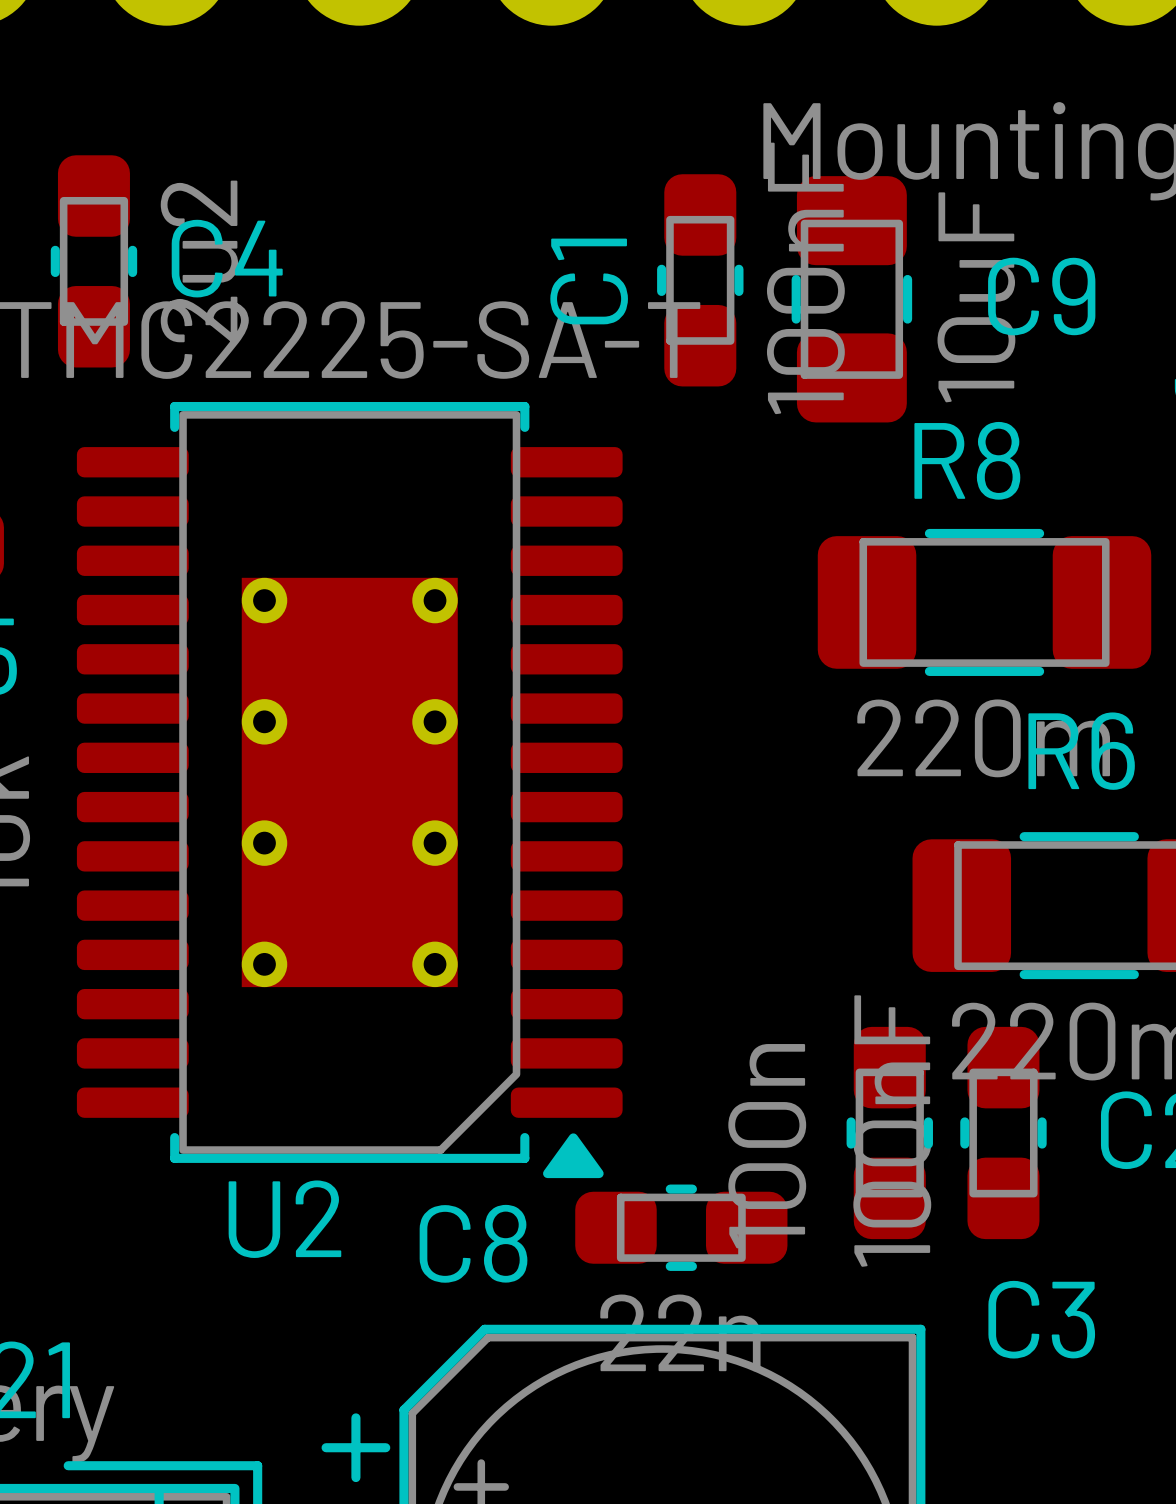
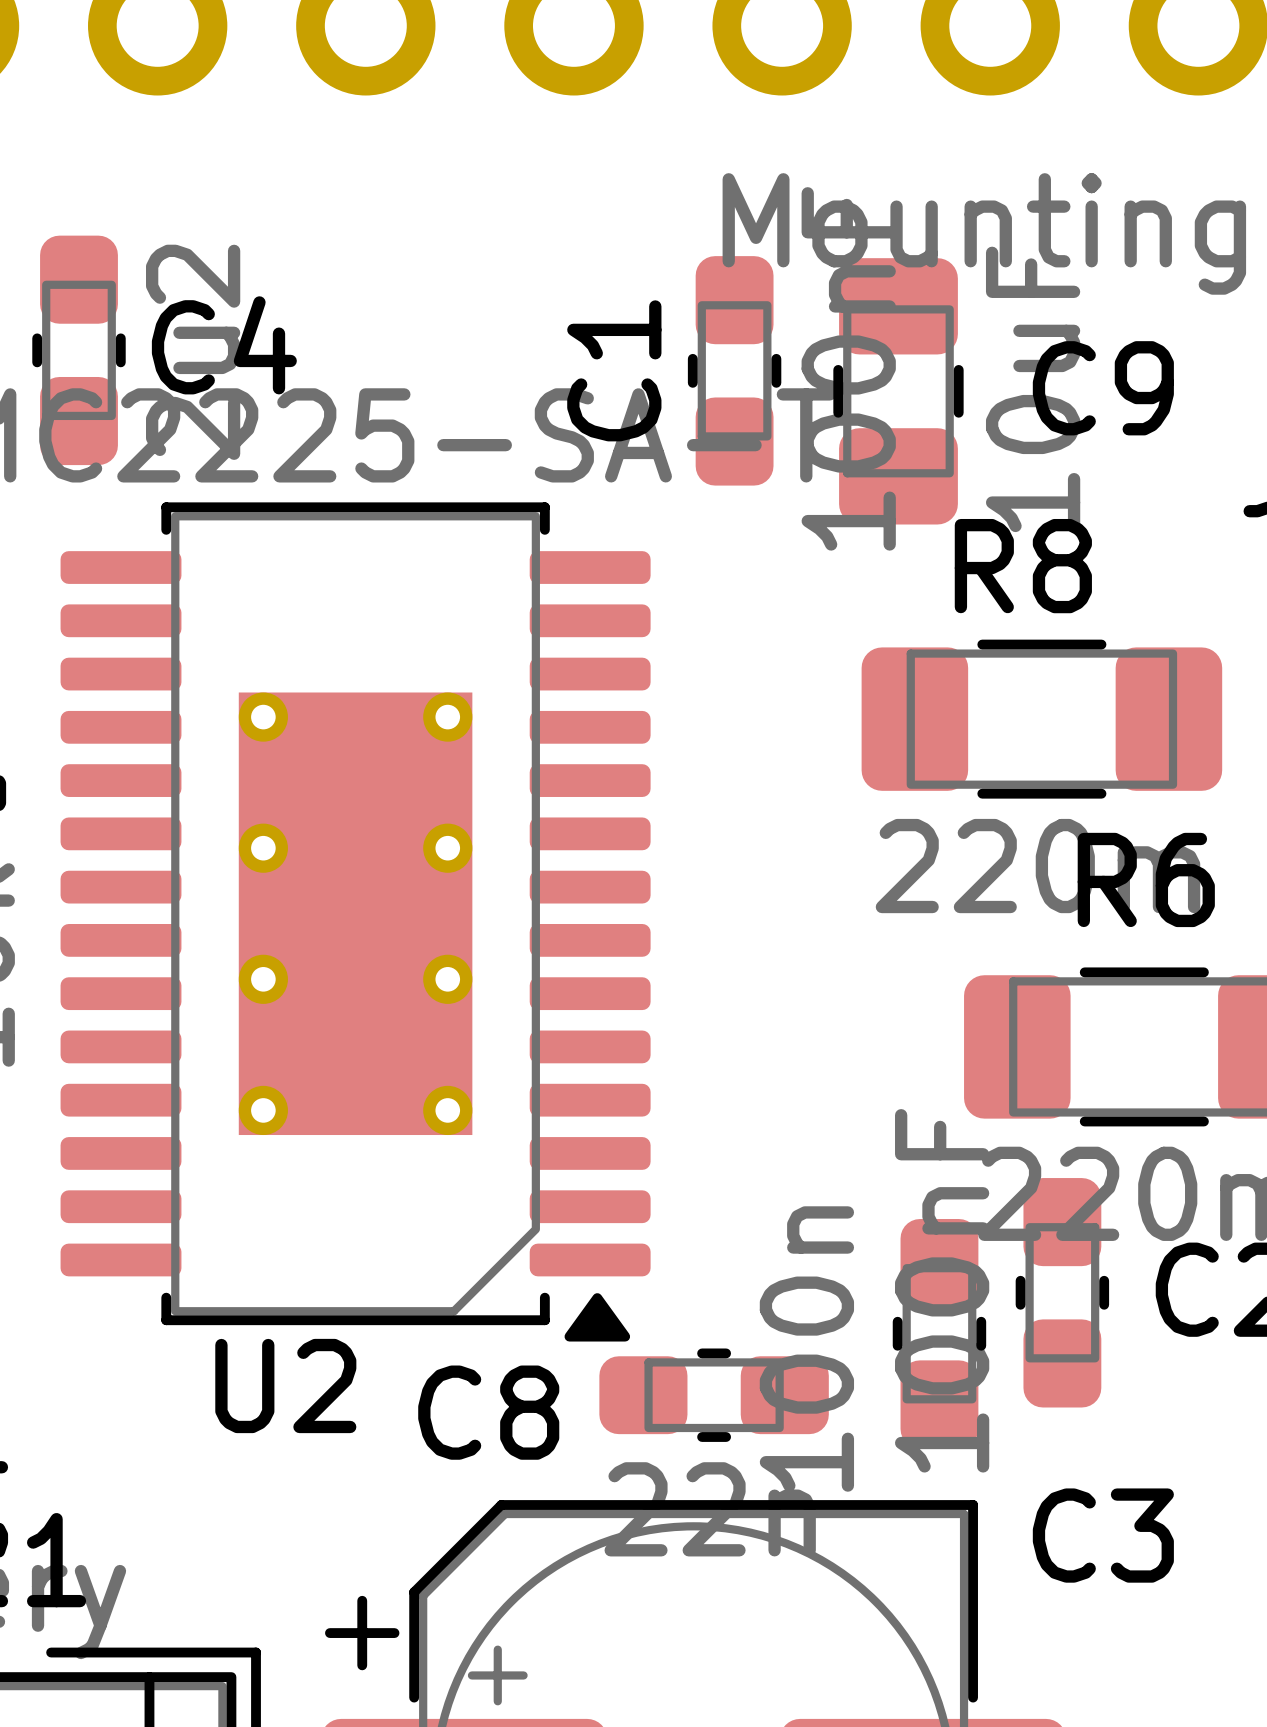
C3 position: (889, 1132) -> (939, 1333)

